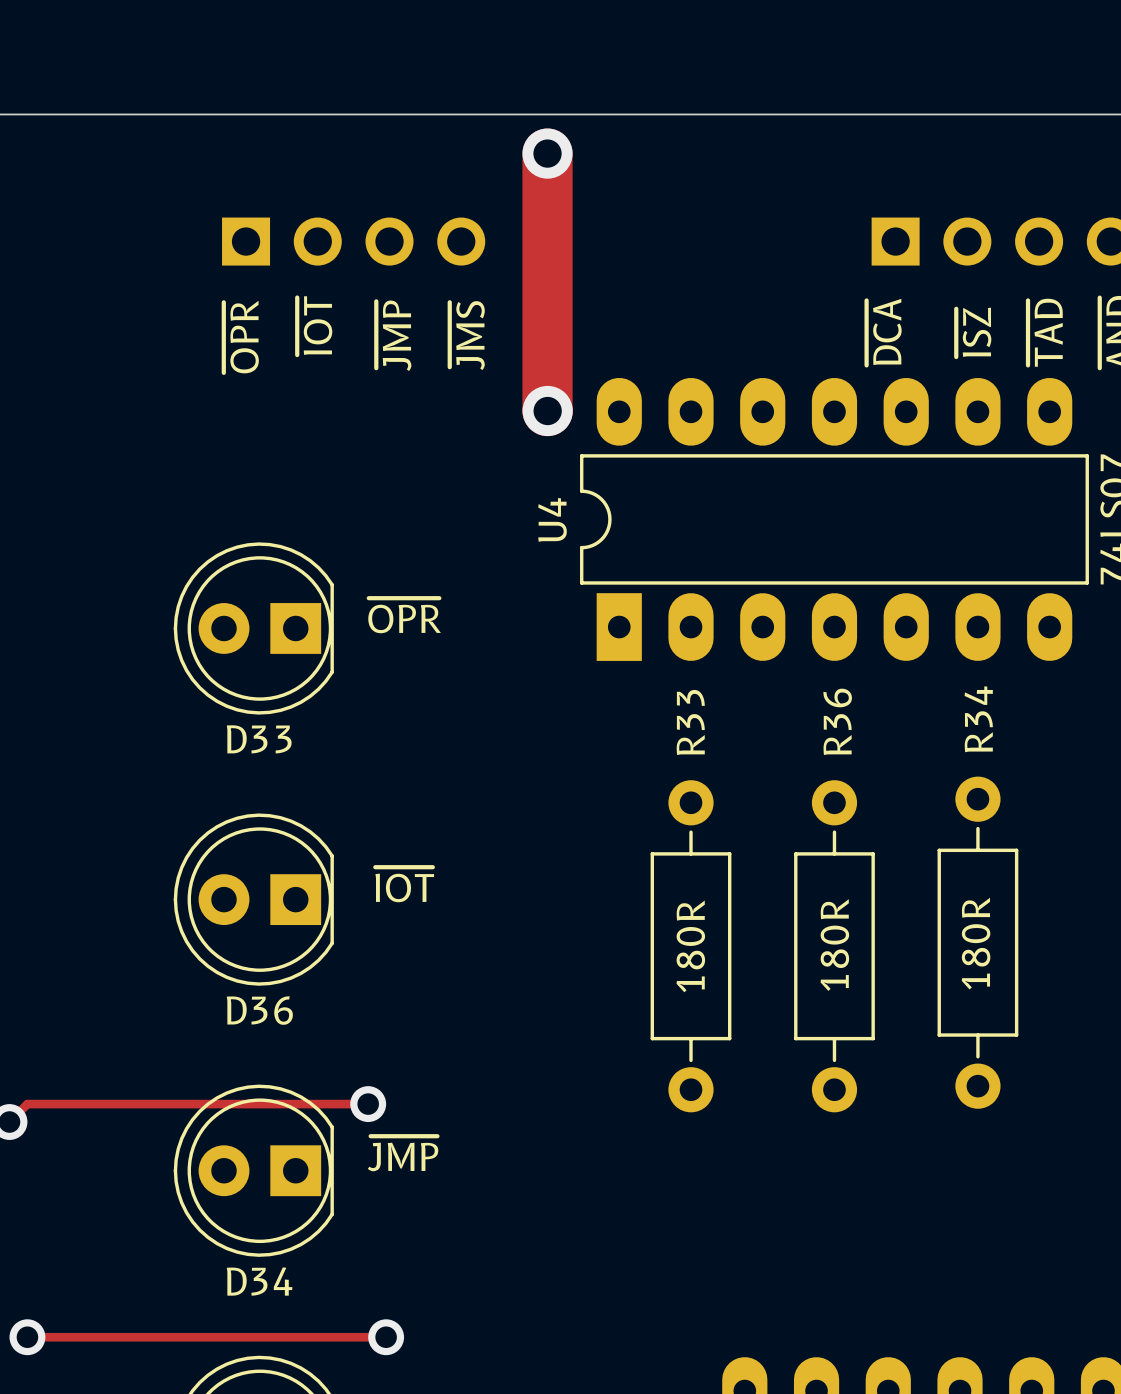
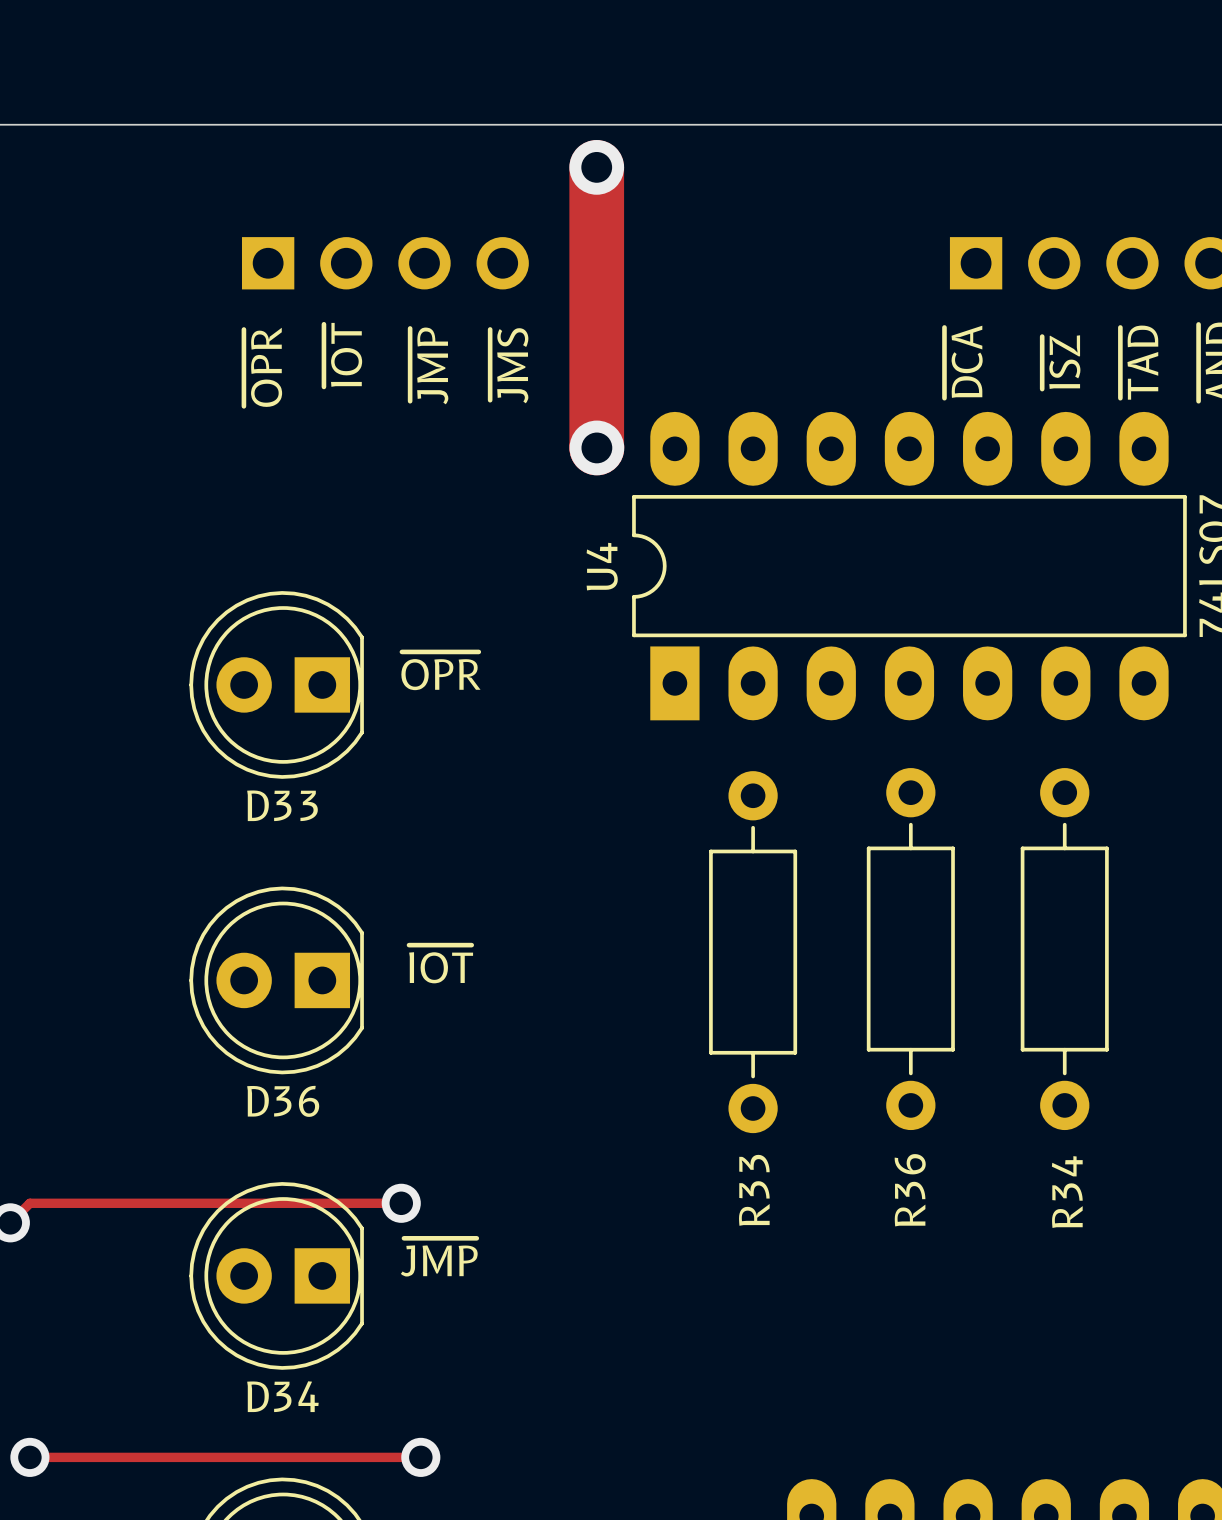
R34 name position: R34 (978, 719) -> R34 (1067, 1192)
R36 name position: R36 (837, 721) -> R36 (910, 1190)
R33 name position: R33 (690, 722) -> R33 (754, 1190)
R34 position: (977, 942) -> (1064, 949)
R34 value: 180R (976, 943) -> none
R36 value: 180R (834, 945) -> none
R33 value: 180R (690, 946) -> none
R33 position: (691, 946) -> (753, 952)
R36 position: (834, 946) -> (910, 949)

